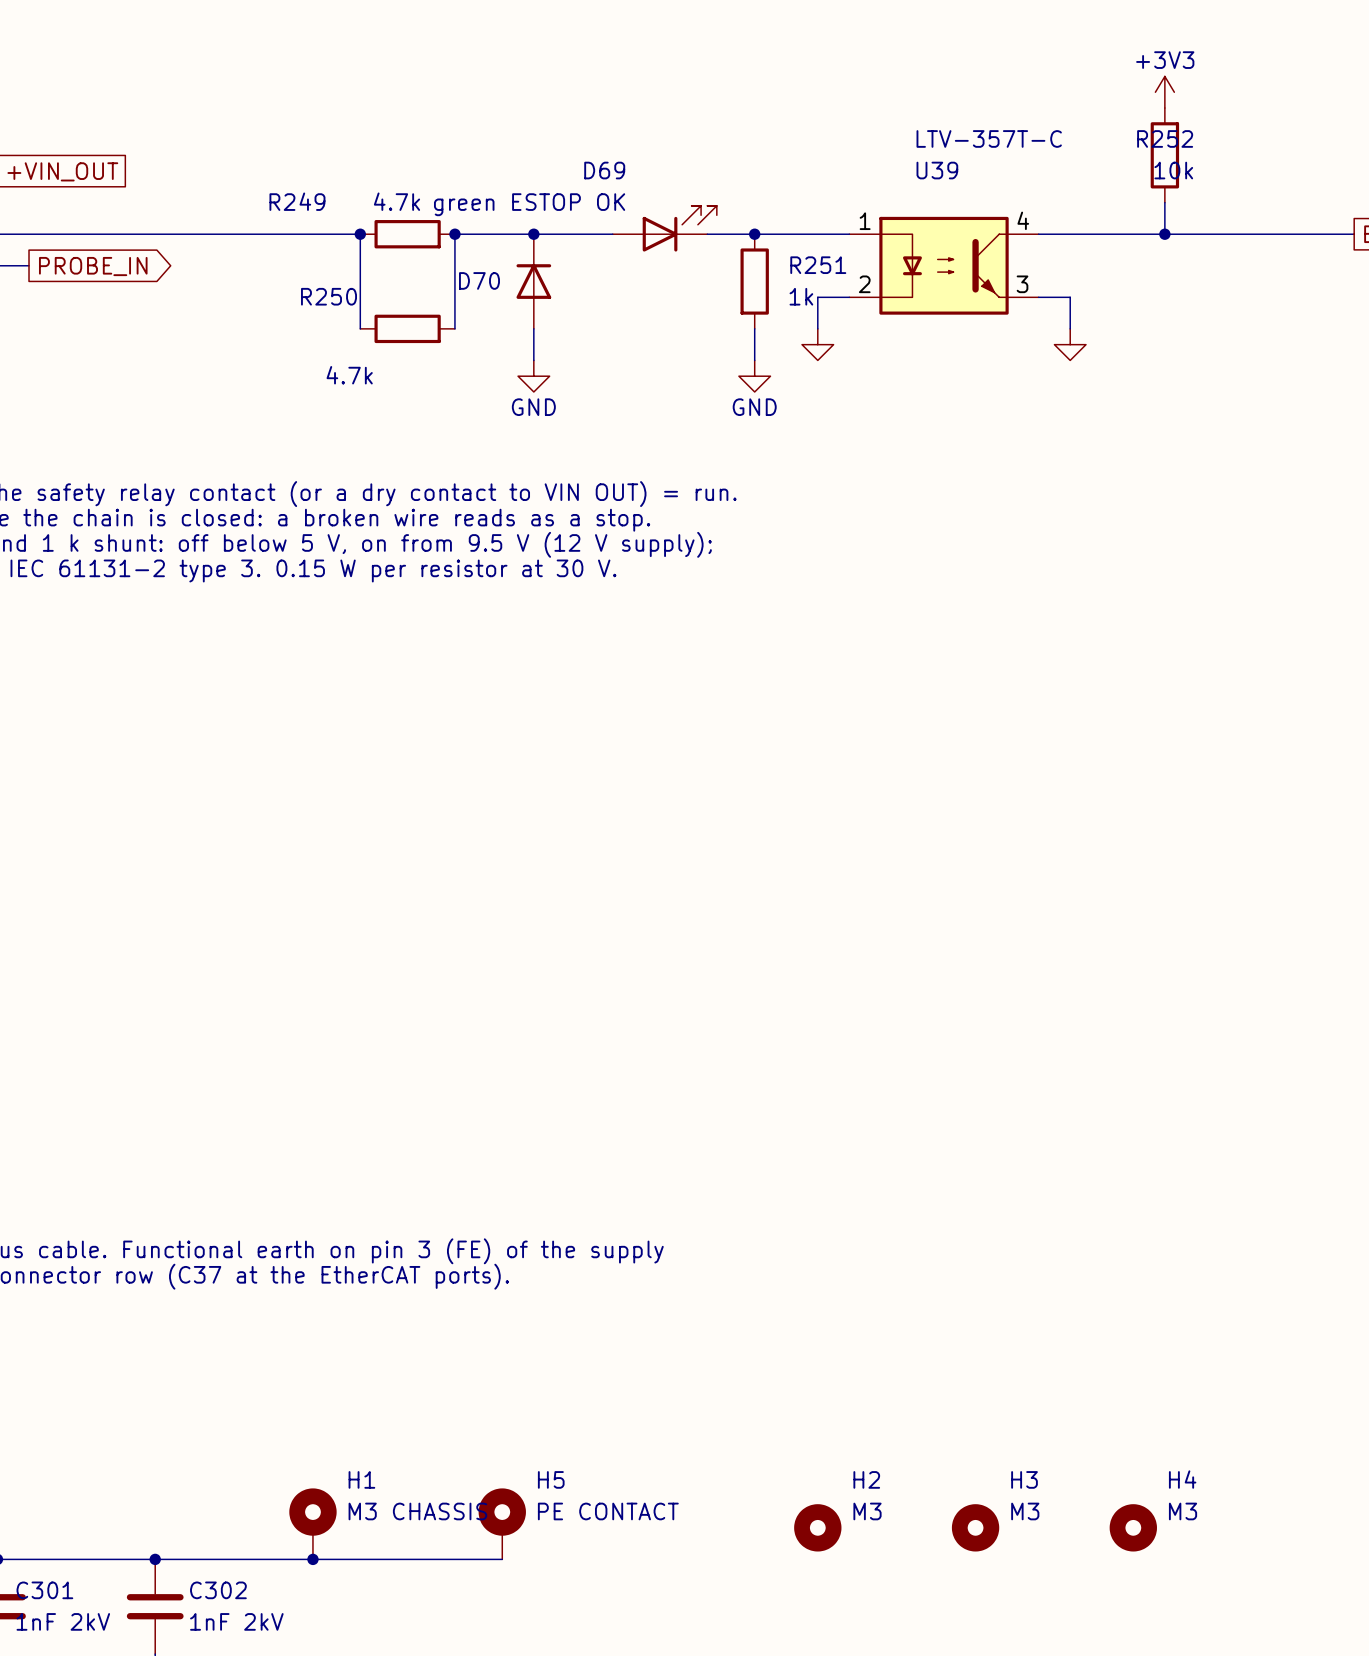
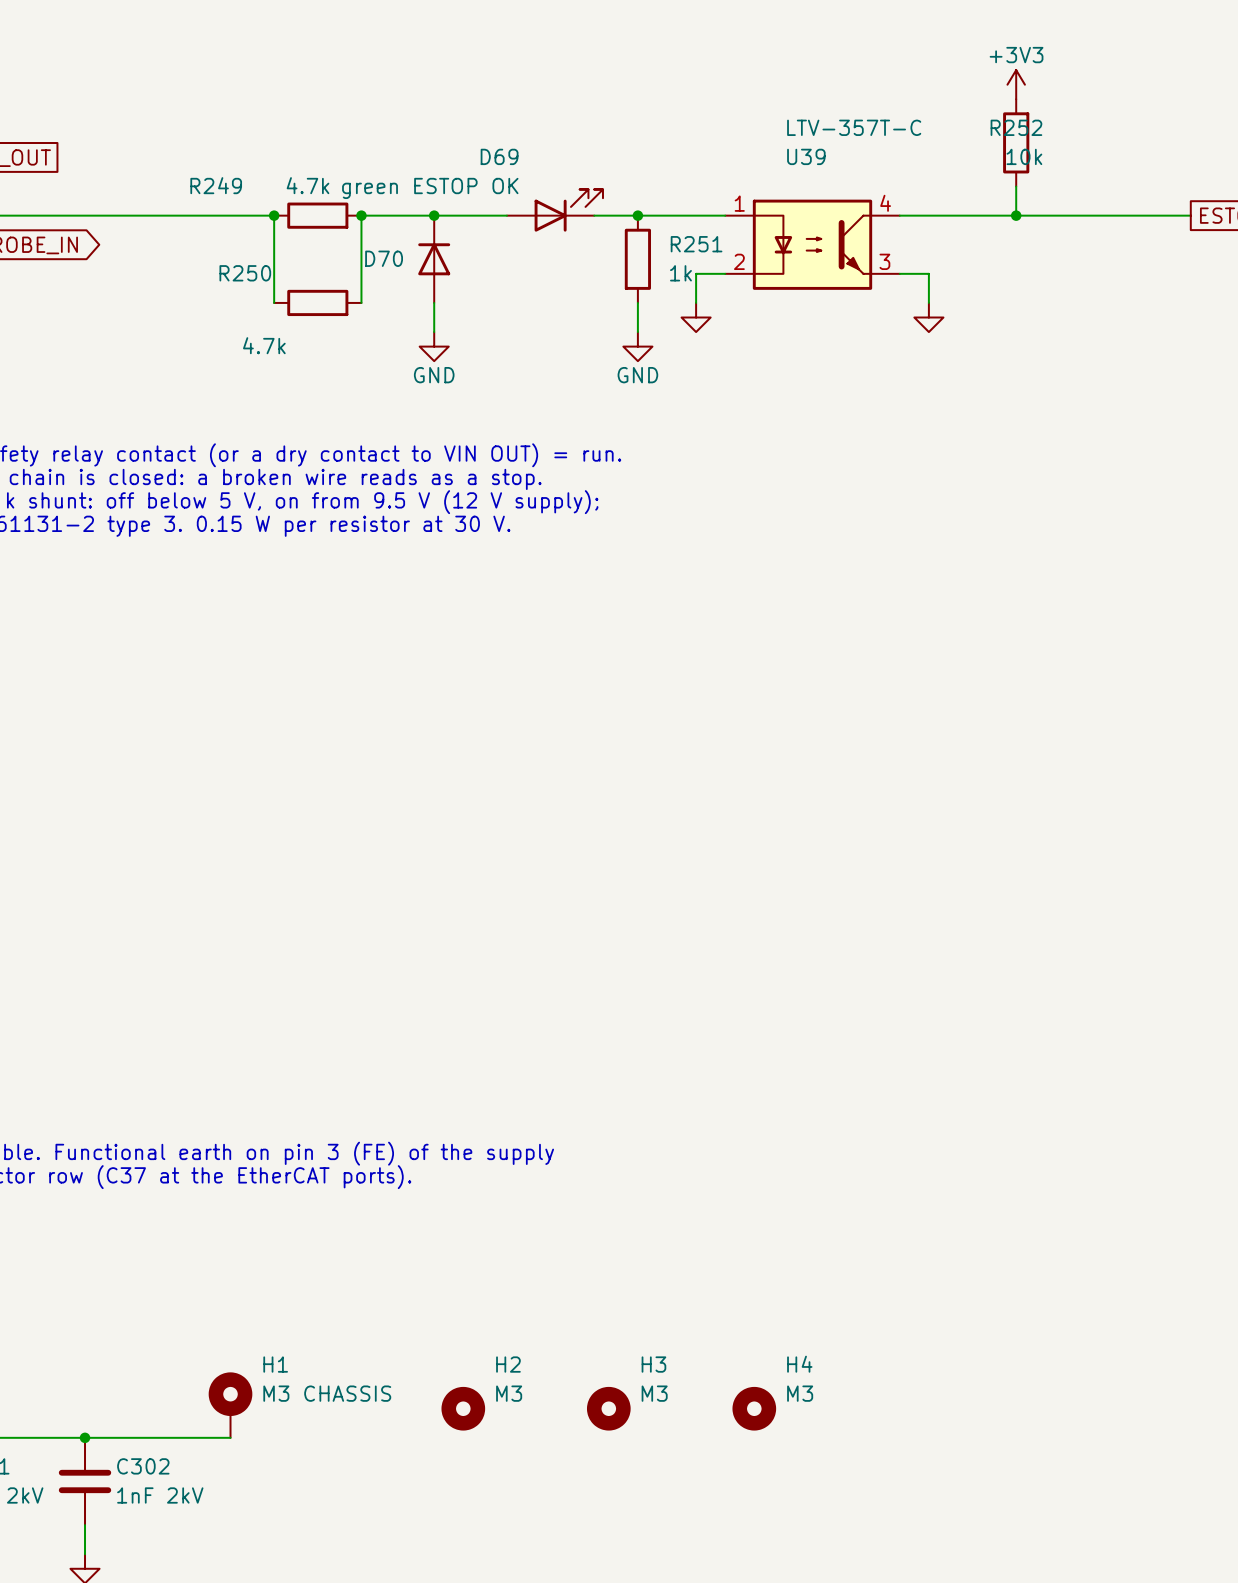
H5: PE CONTACT (502, 1523) -> none
H2 position: (817, 1527) -> (463, 1408)
H3 position: (975, 1527) -> (608, 1408)
H4 position: (1133, 1527) -> (754, 1408)
wire: (312, 1559) (502, 1559) -> none
junction: (312, 1559) -> none

